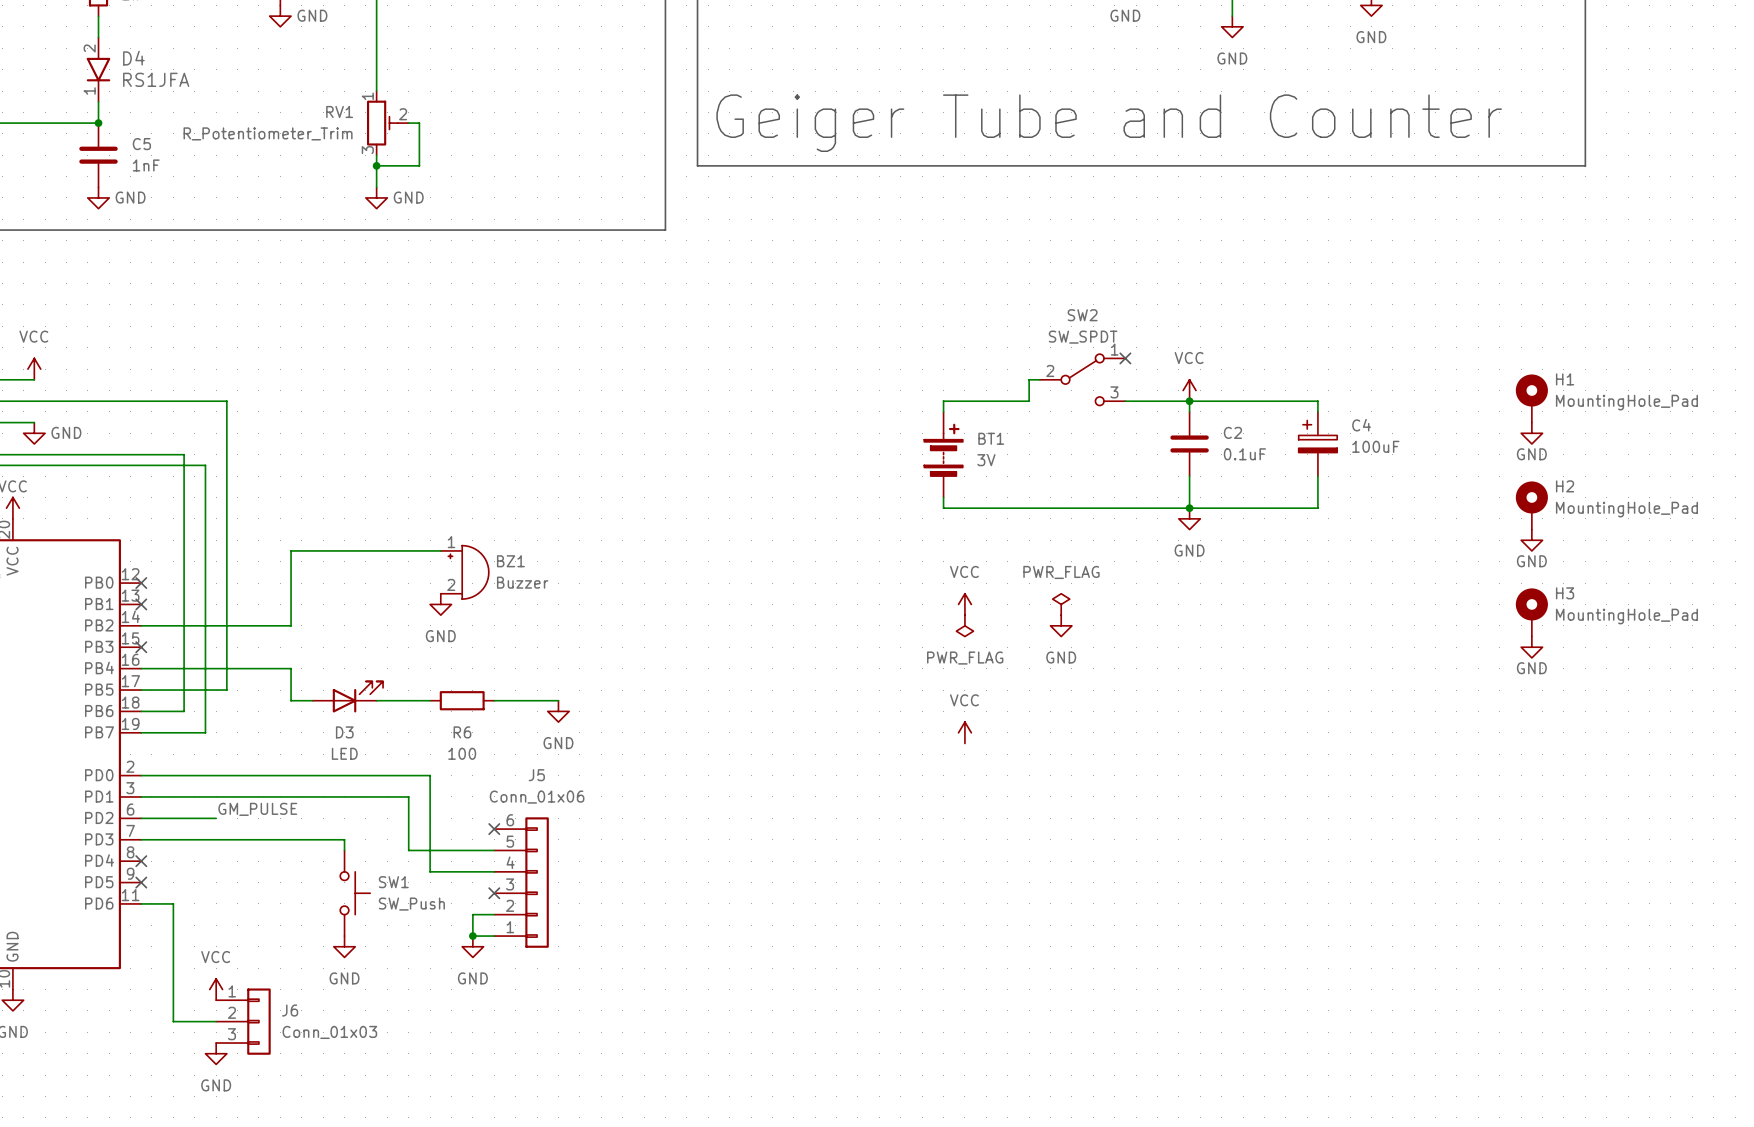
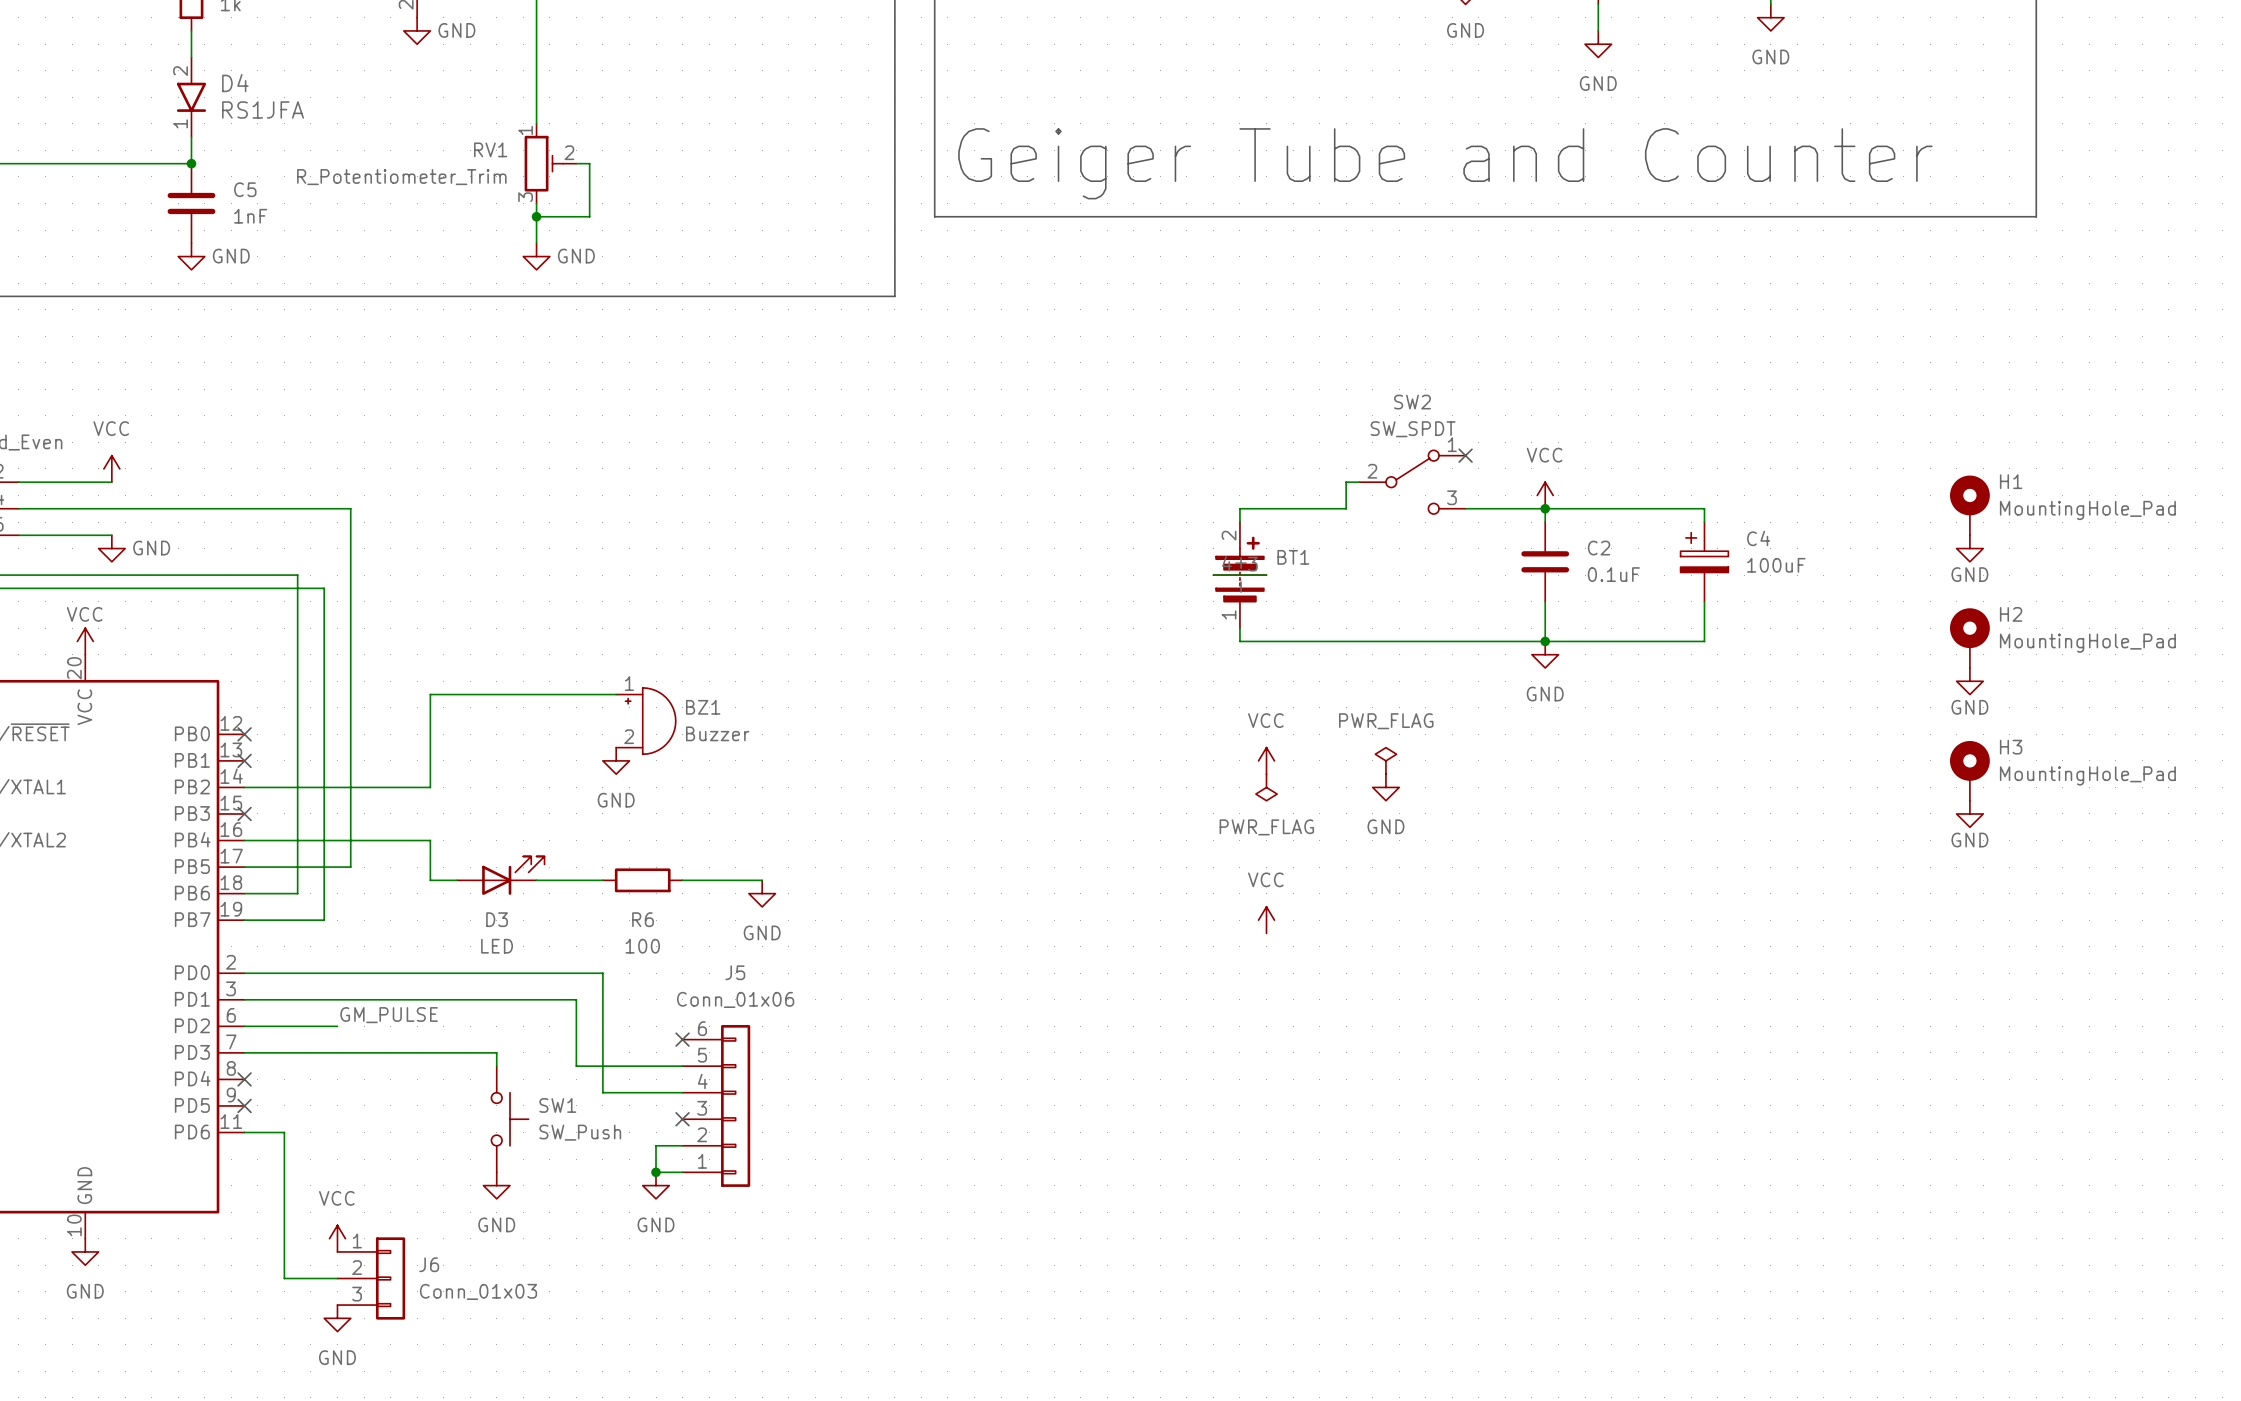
BT1 symbol: [924, 411, 963, 498] -> [1213, 522, 1267, 629]
wire: none -> (1213, 575) (1266, 575)
BT1 value: 3V (986, 460) -> none

